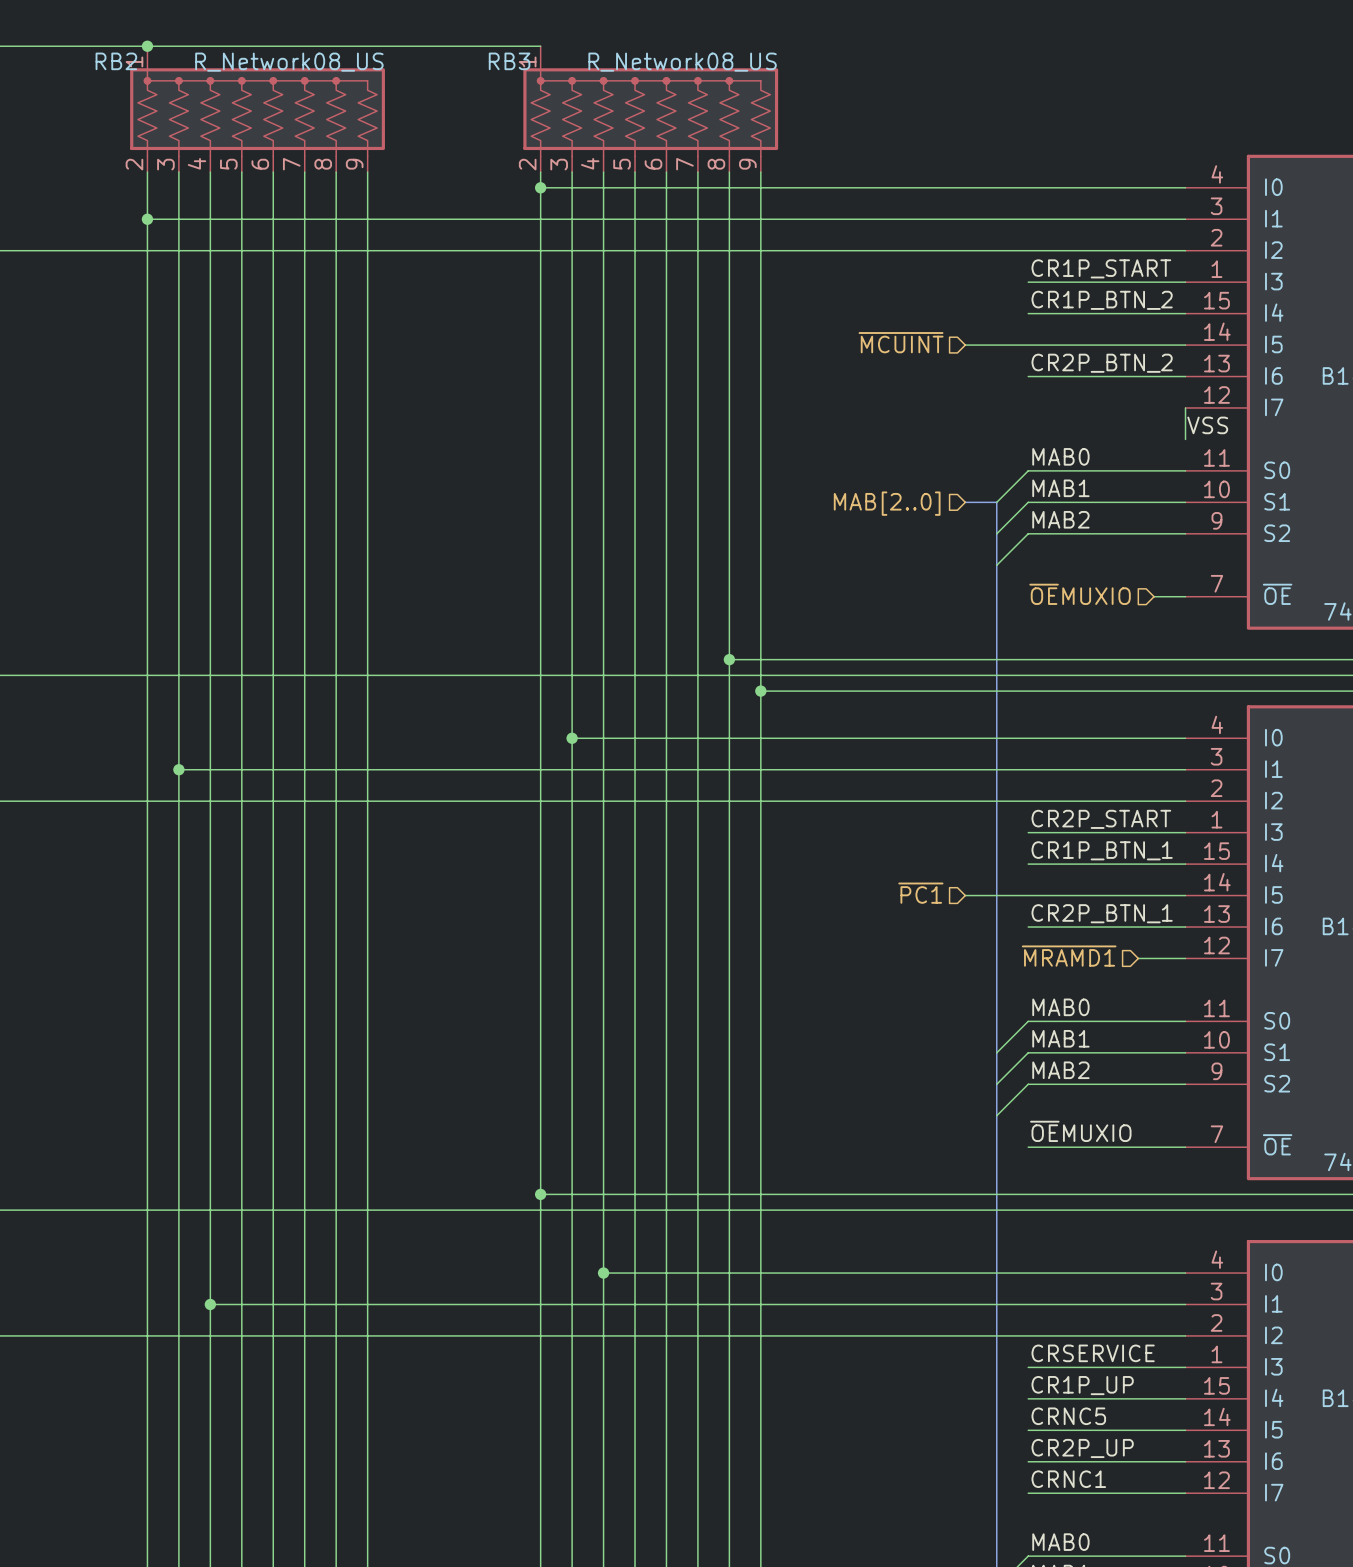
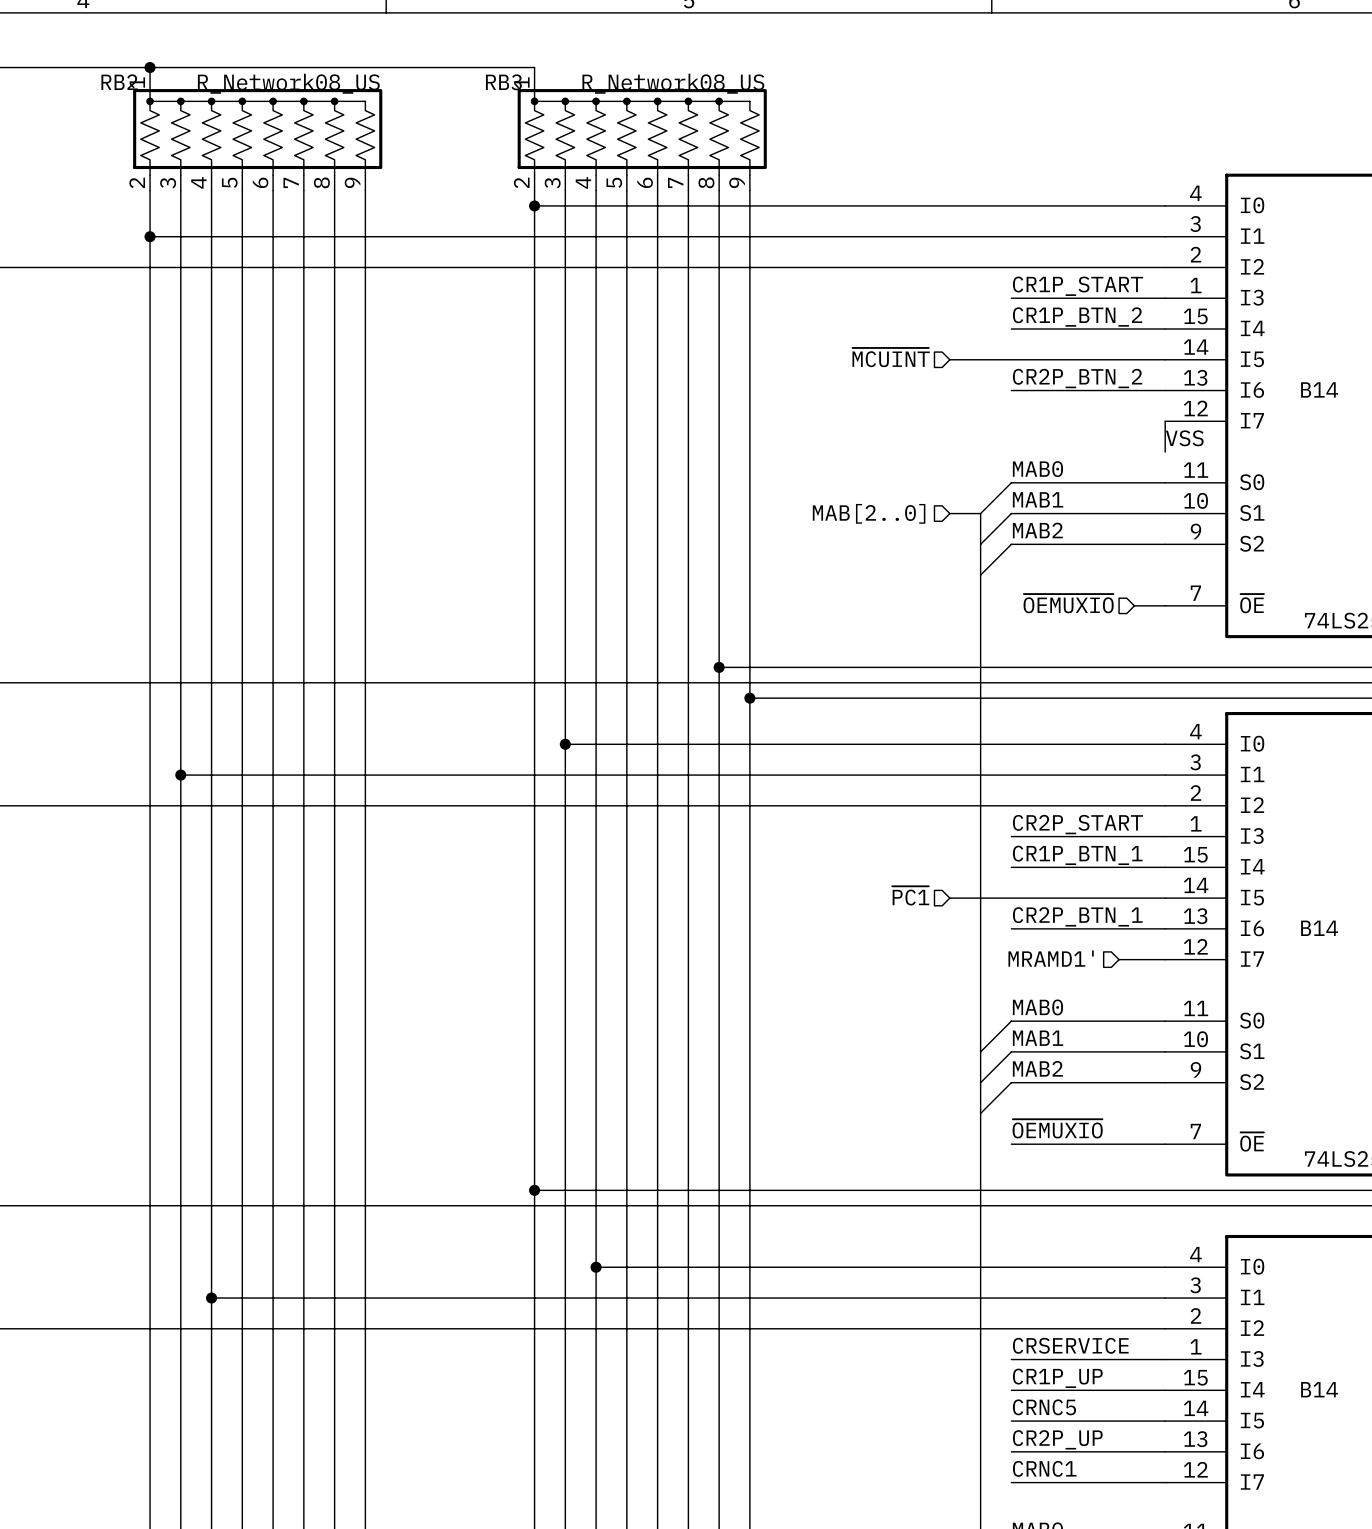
hierarchical label: ~{OE}MUXIO (1080, 594) -> ~{OEMUXIO} (1068, 603)
hierarchical label: ~{MRAMD1} (1069, 956) -> MRAMD1' (1051, 958)
label: ~{OE}MUXIO (1080, 1131) -> ~{OEMUXIO} (1057, 1128)

